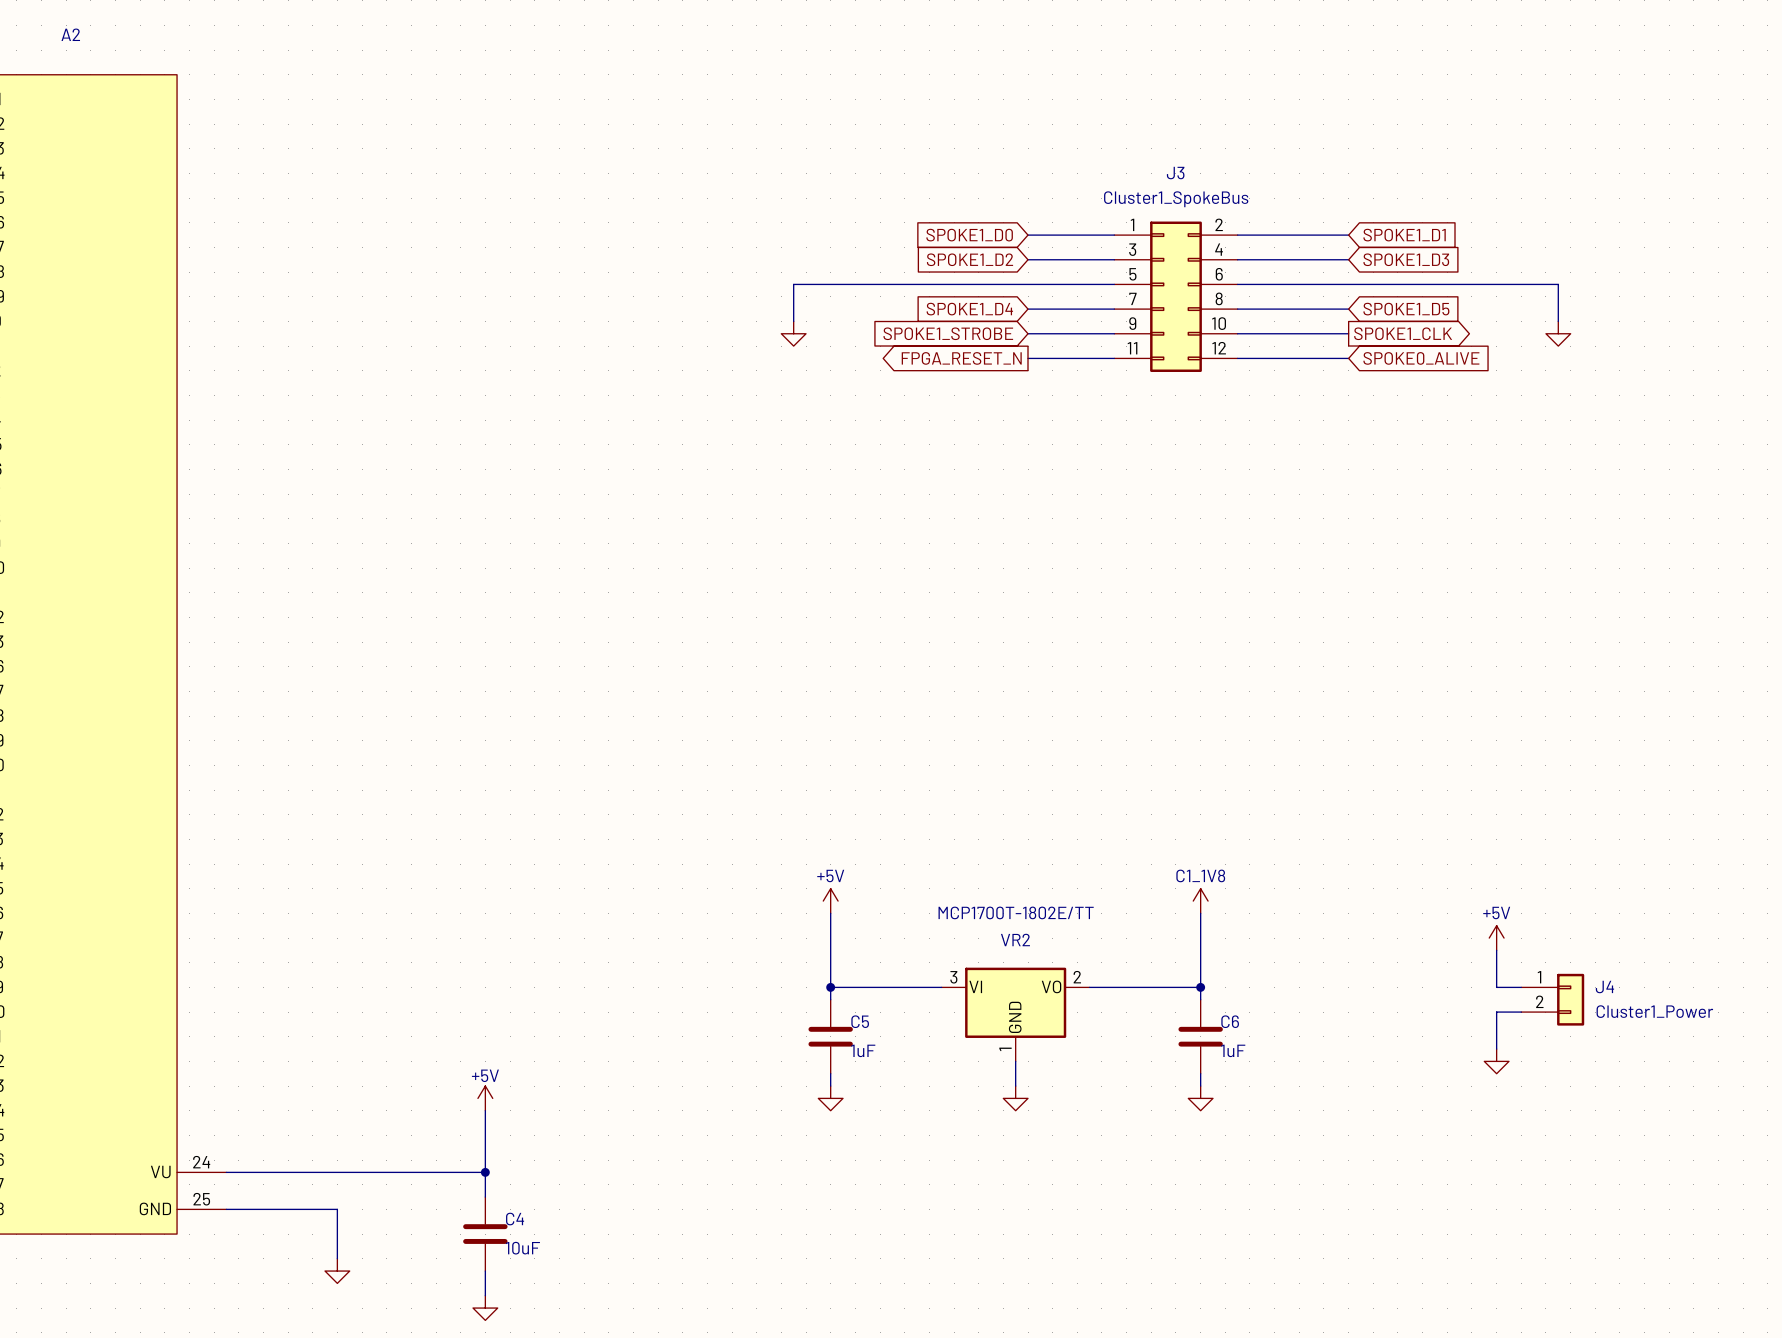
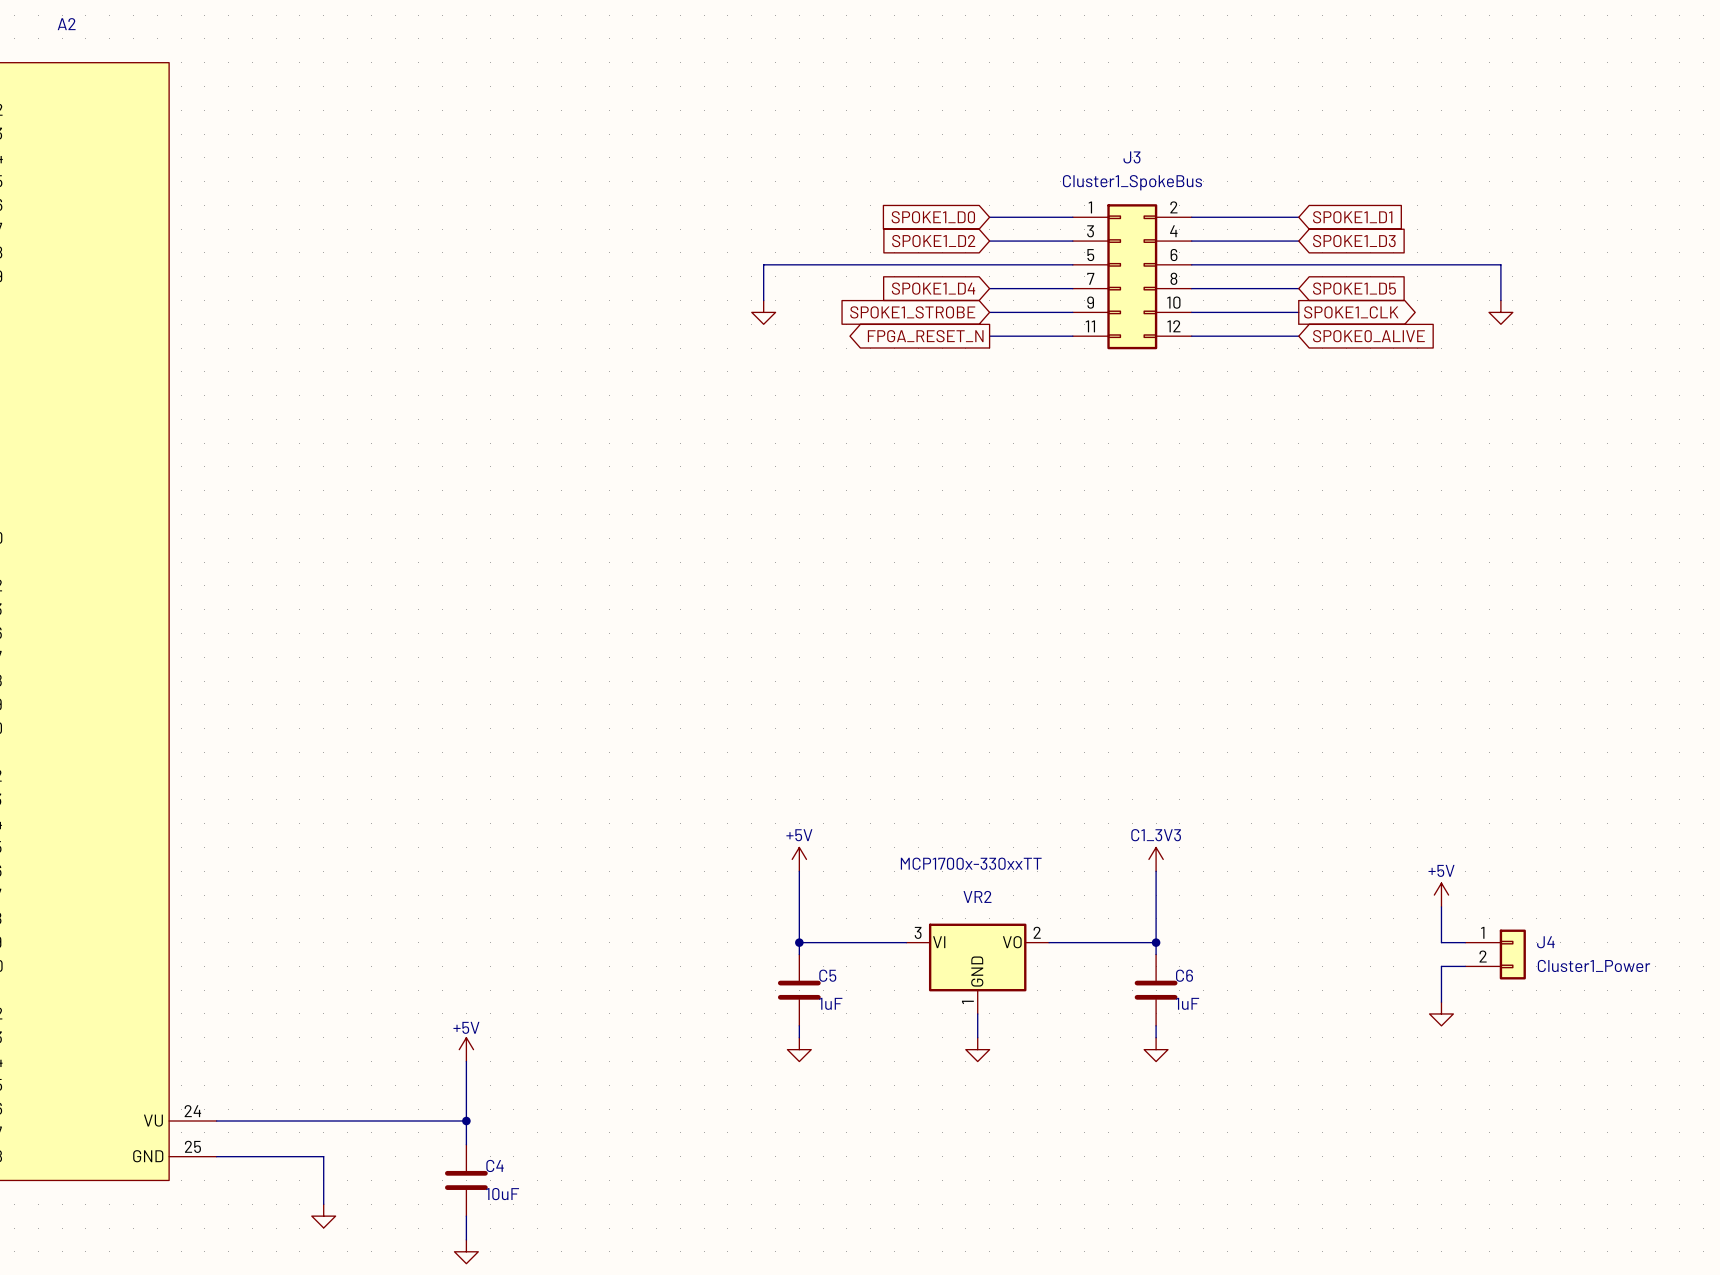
power symbol: C1_1V8 (1200, 901) -> C1_3V3 (1156, 859)
VR2 value: MCP1700T-1802E/TT (1016, 912) -> MCP1700x-330xxTT (971, 863)

